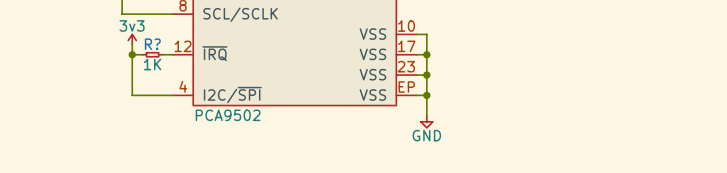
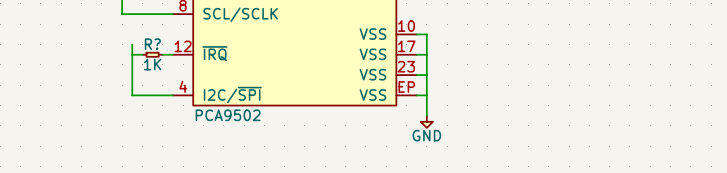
power symbol: 3v3 (132, 39) -> none
junction: (132, 54) -> none
junction: (426, 54) -> none
junction: (426, 75) -> none
junction: (426, 95) -> none

